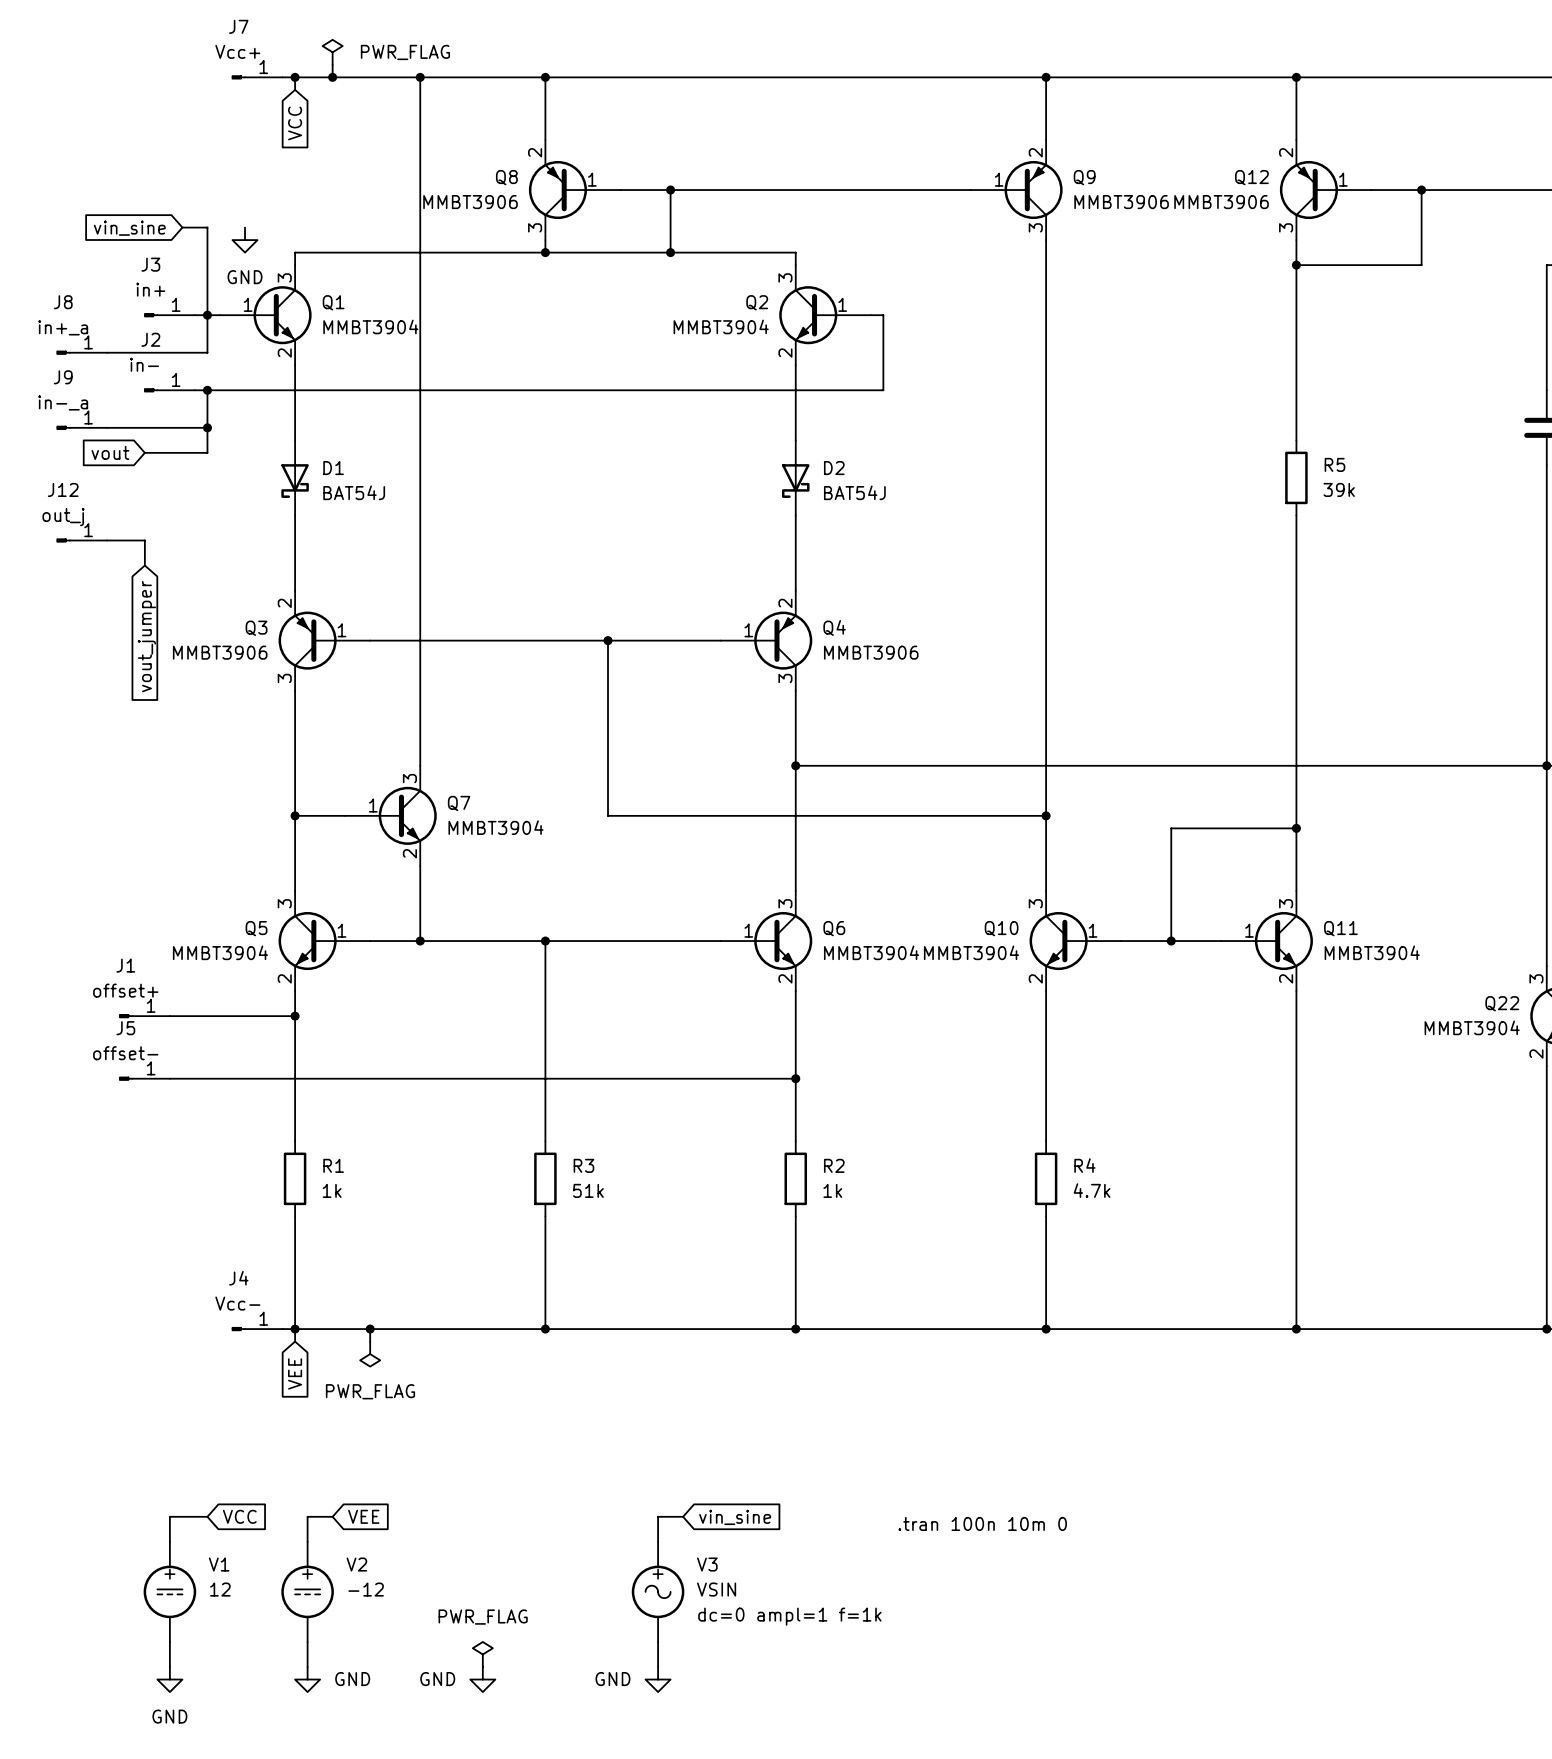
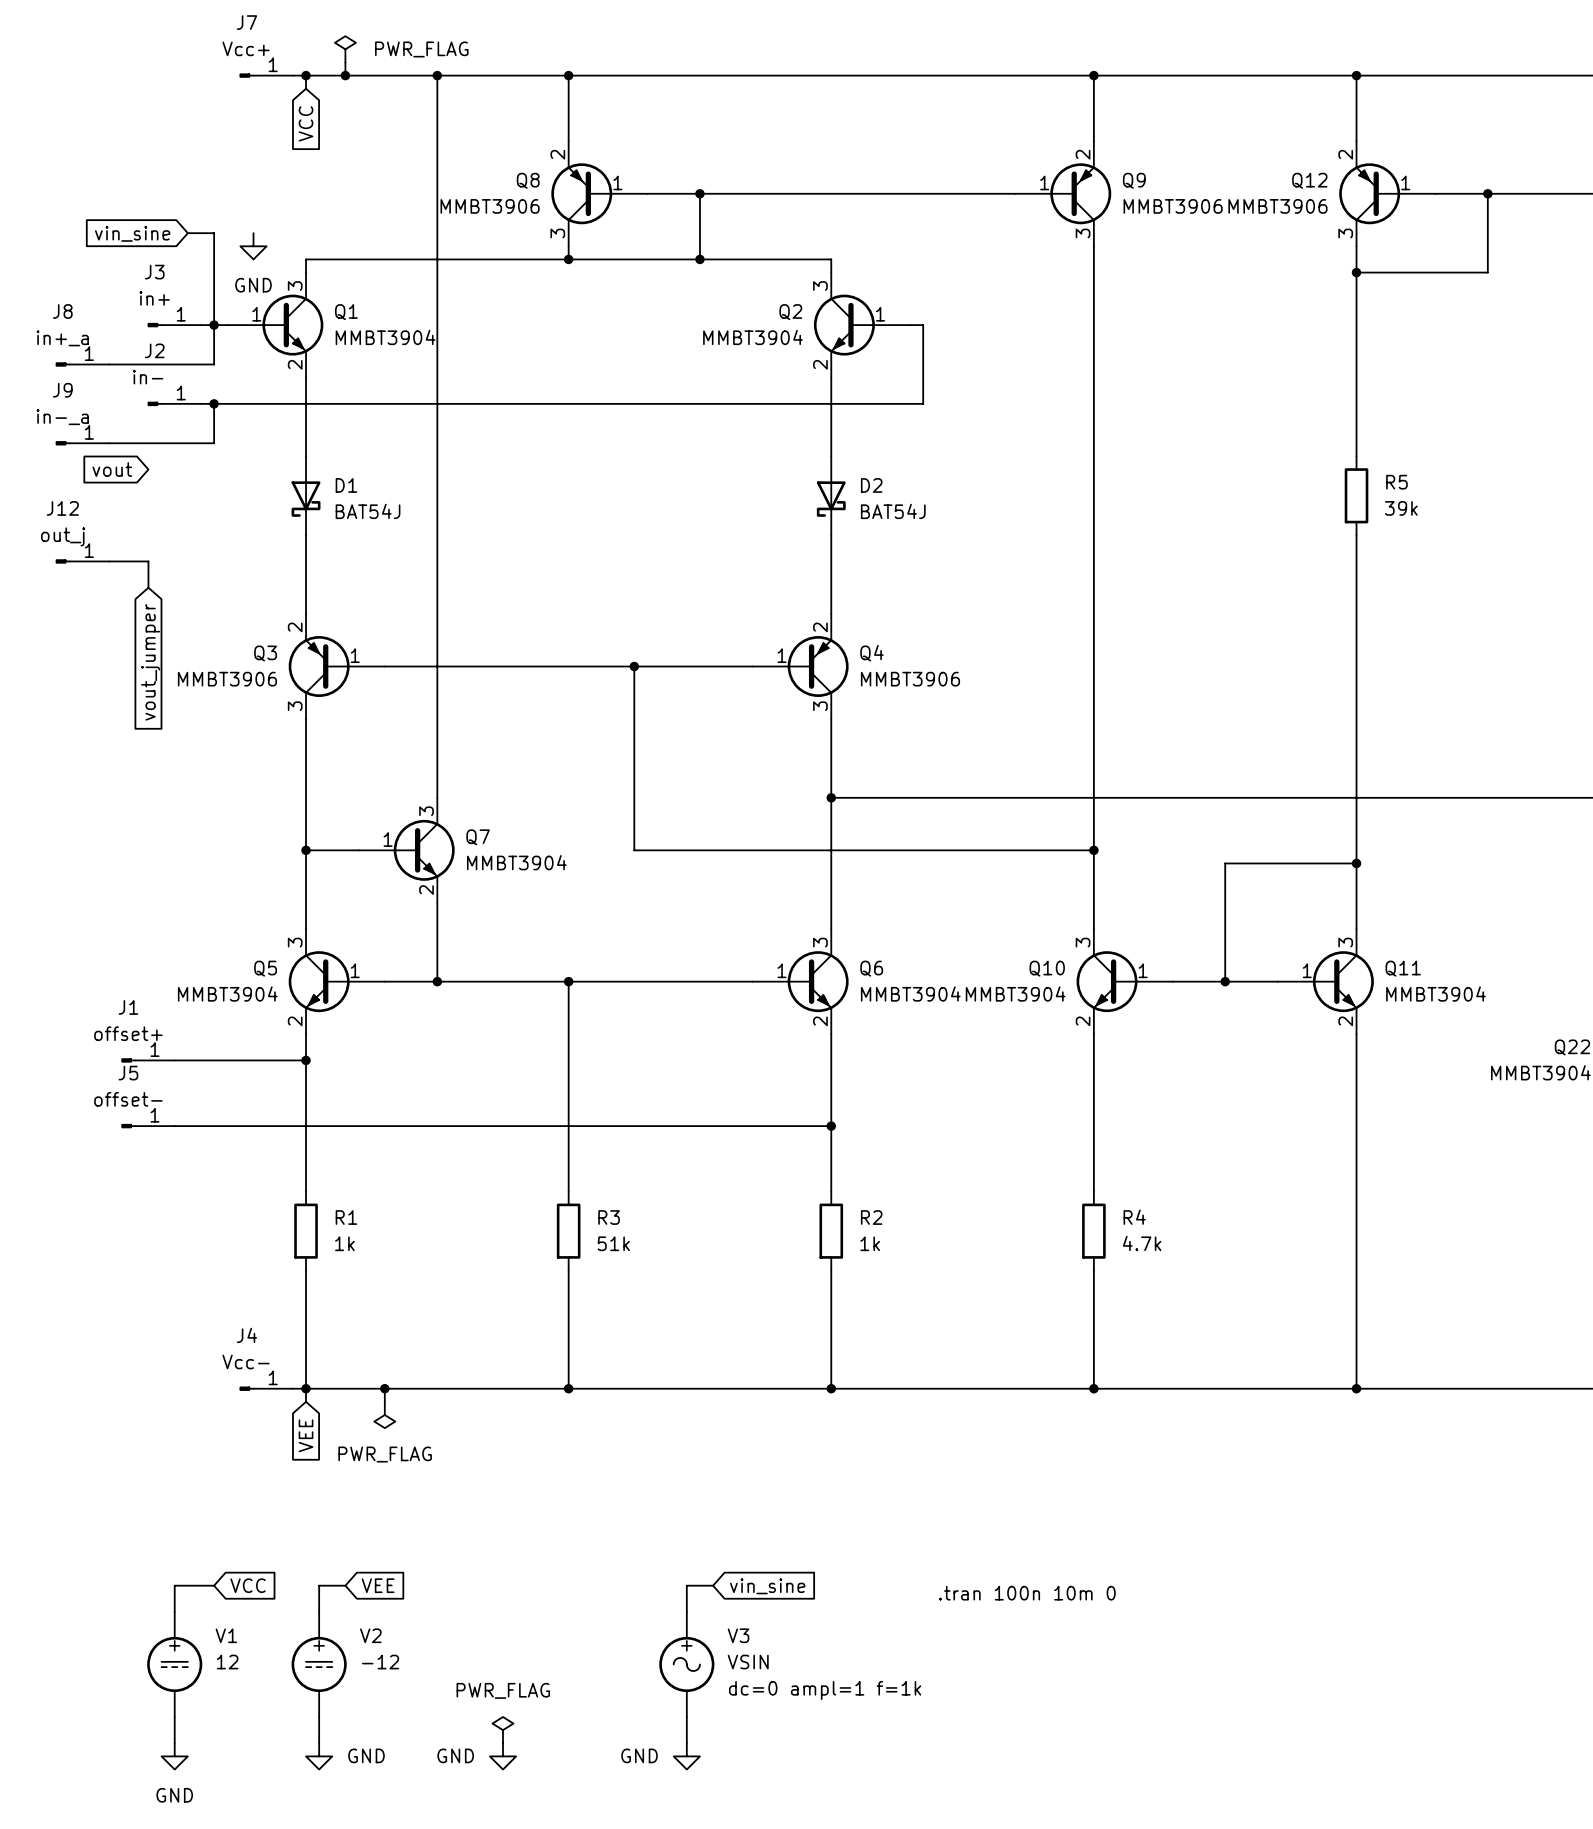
wire: (207, 427) (207, 452) (144, 452) -> none
junction: (207, 427) -> none

